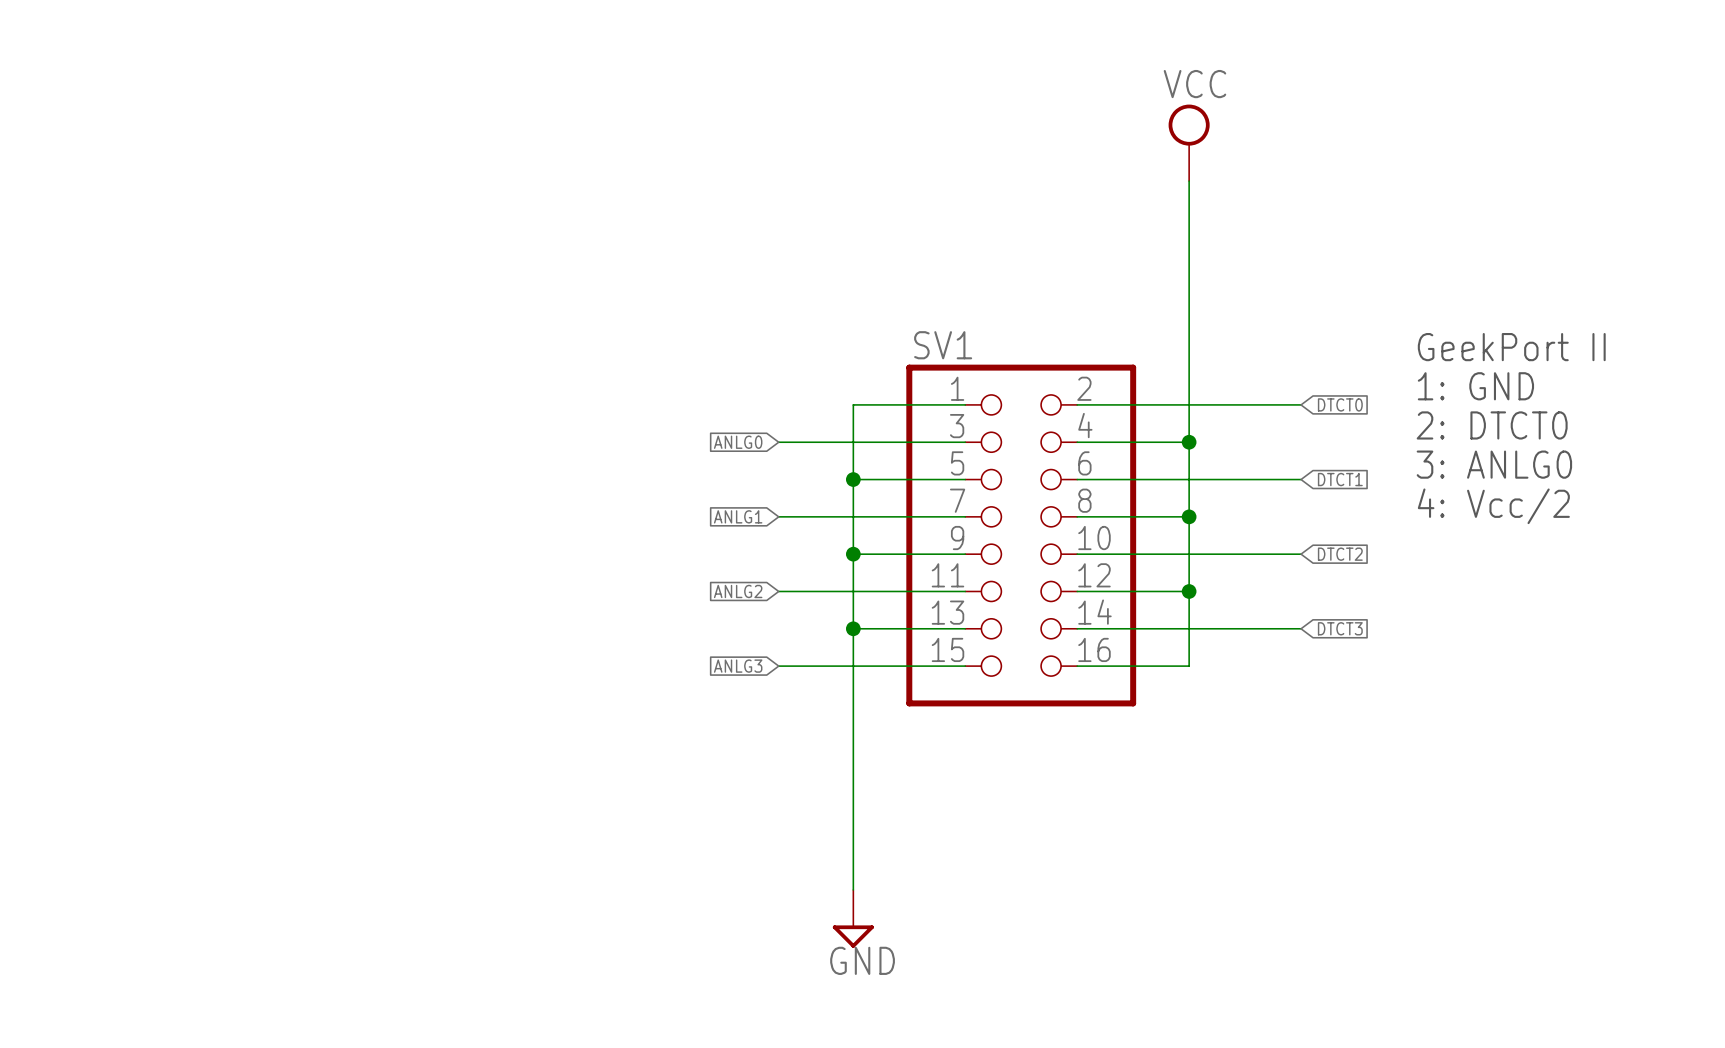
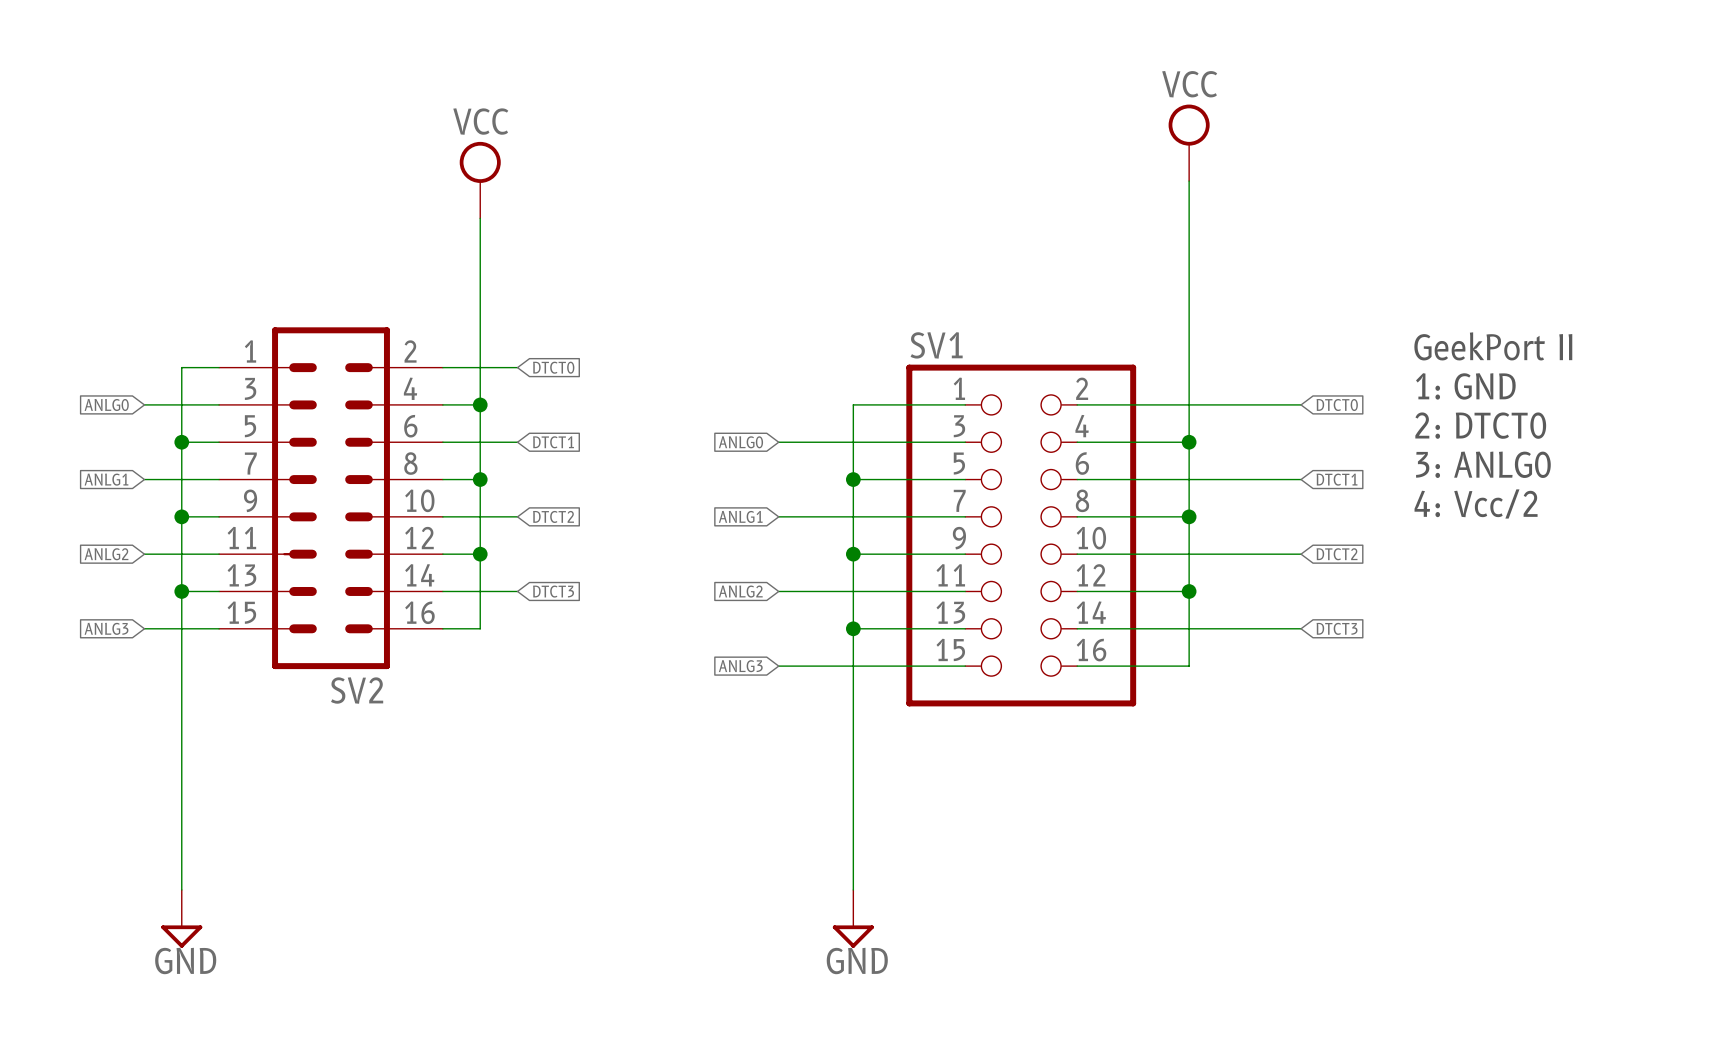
power symbol: none -> VCC (480, 180)
wire: none -> (480, 218) (480, 628) (442, 628)
wire: none -> (219, 367) (181, 367) (181, 889)
wire: none -> (442, 367) (517, 367)
global label: none -> DTCT0 (553, 367)
global label: none -> ANLG0 (106, 405)
wire: none -> (144, 404) (219, 404)
wire: none -> (442, 404) (480, 404)
junction: none -> (480, 404)
wire: none -> (181, 442) (219, 442)
junction: none -> (181, 442)
wire: none -> (442, 442) (517, 442)
global label: none -> DTCT1 (553, 442)
global label: none -> ANLG1 (106, 479)
wire: none -> (144, 479) (219, 479)
wire: none -> (442, 479) (480, 479)
junction: none -> (480, 479)
SV2: none -> (331, 498)
wire: none -> (181, 516) (219, 516)
junction: none -> (181, 516)
wire: none -> (442, 516) (517, 516)
global label: none -> DTCT2 (553, 516)
global label: none -> ANLG2 (106, 554)
wire: none -> (144, 554) (219, 554)
wire: none -> (442, 554) (480, 554)
junction: none -> (480, 554)
wire: none -> (181, 591) (219, 591)
junction: none -> (181, 591)
wire: none -> (442, 591) (517, 591)
global label: none -> DTCT3 (553, 591)
global label: none -> ANLG3 (106, 628)
wire: none -> (144, 628) (219, 628)
power symbol: none -> GND (181, 918)

